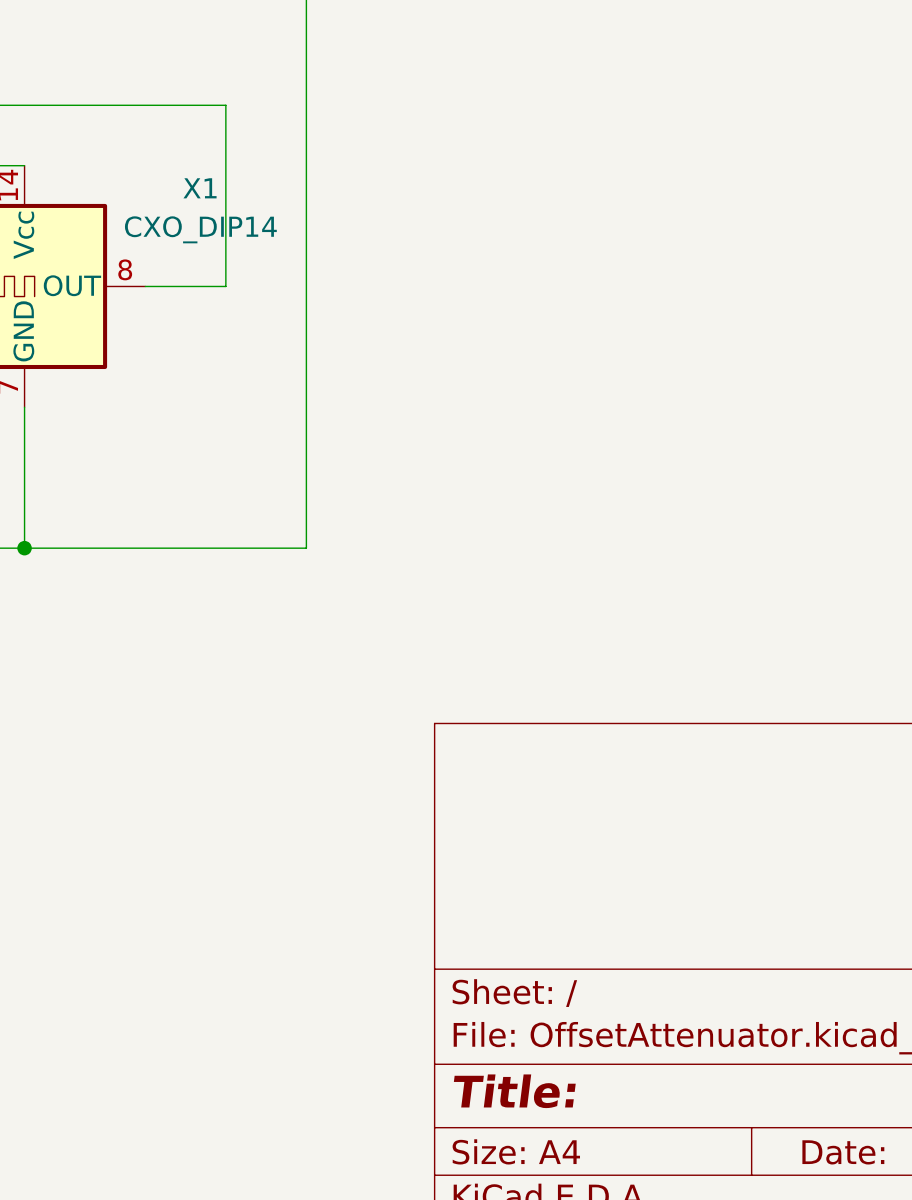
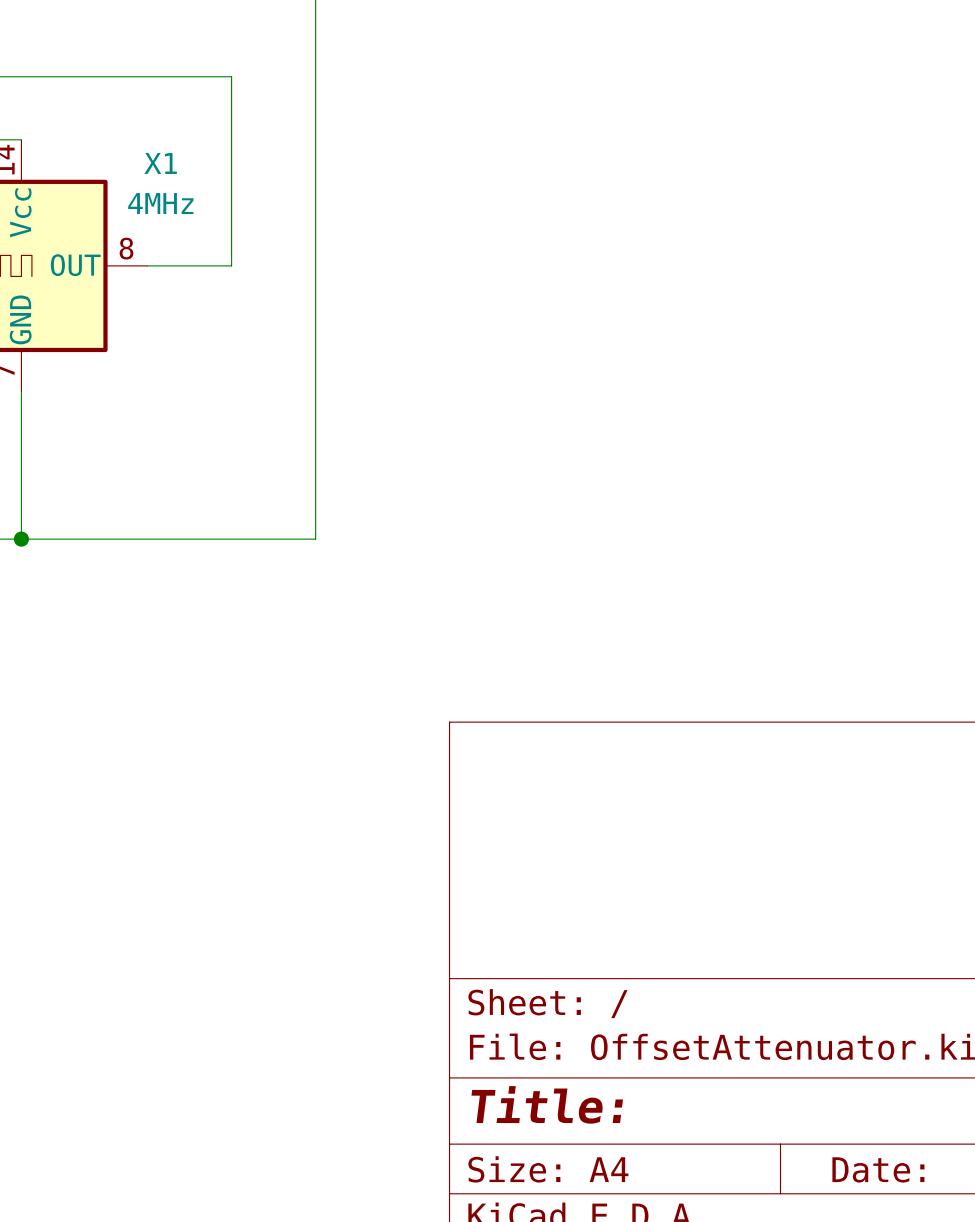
X1 name position: X1 (200, 188) -> X1 (160, 163)
X1 value: CXO_DIP14 (200, 229) -> 4MHz (160, 203)

